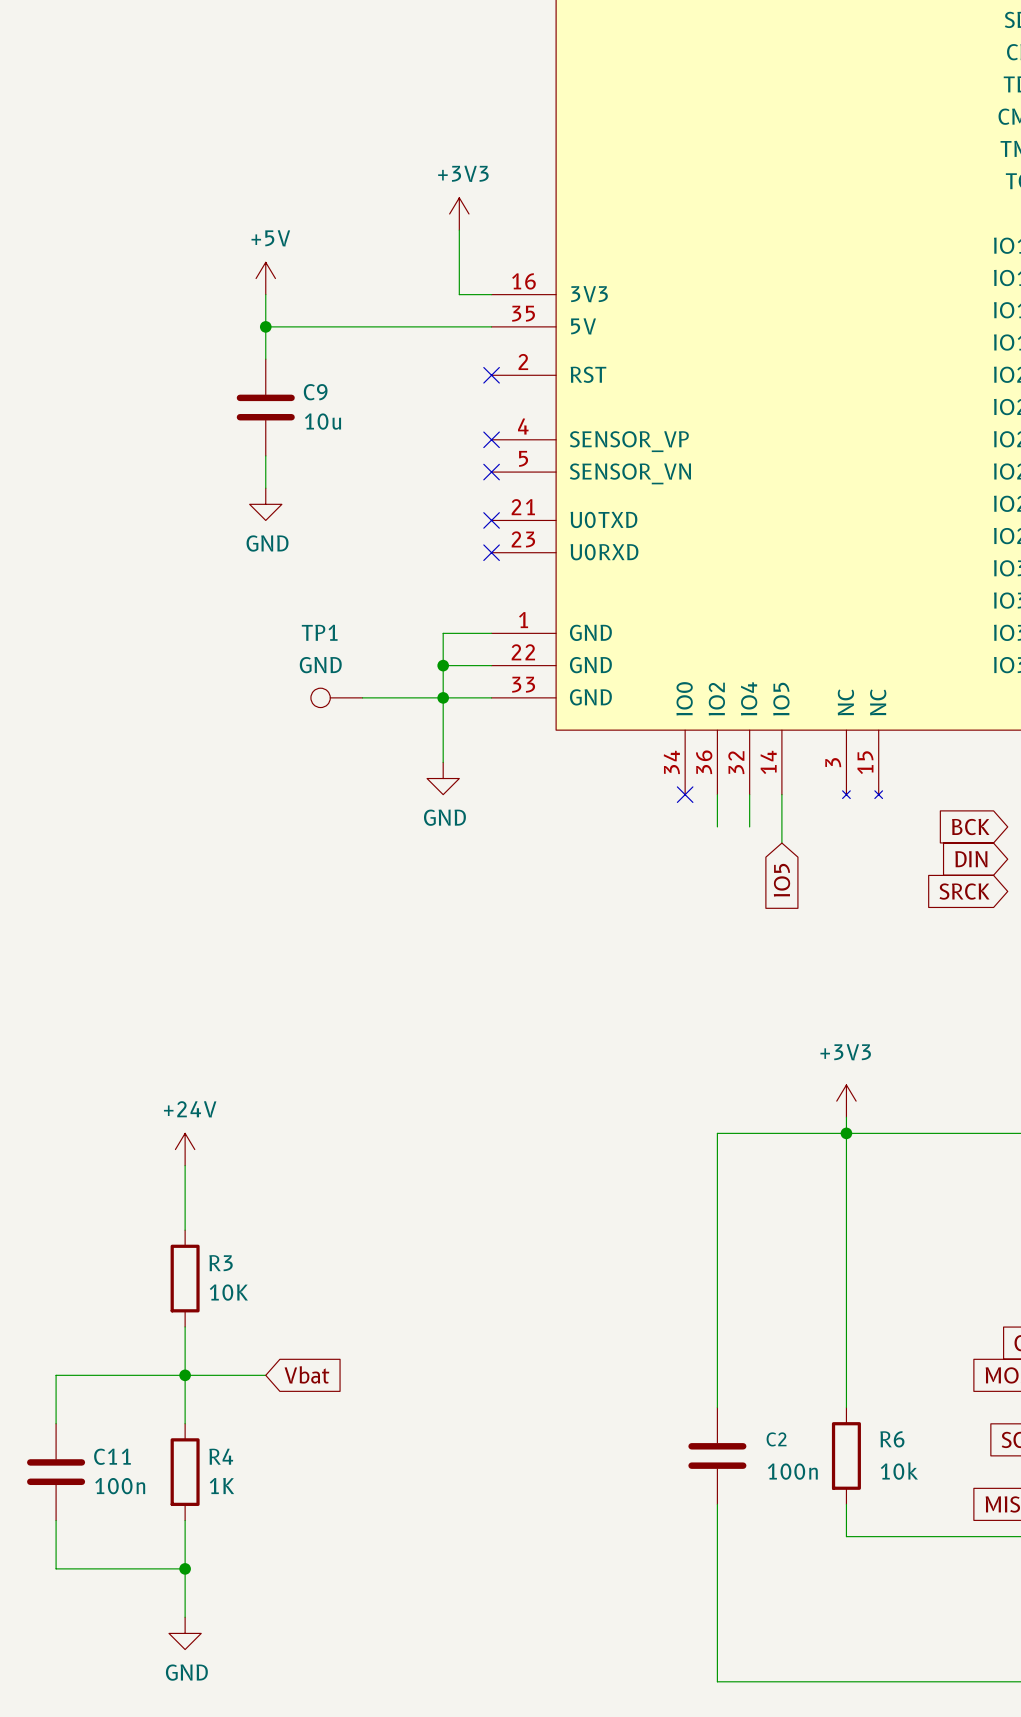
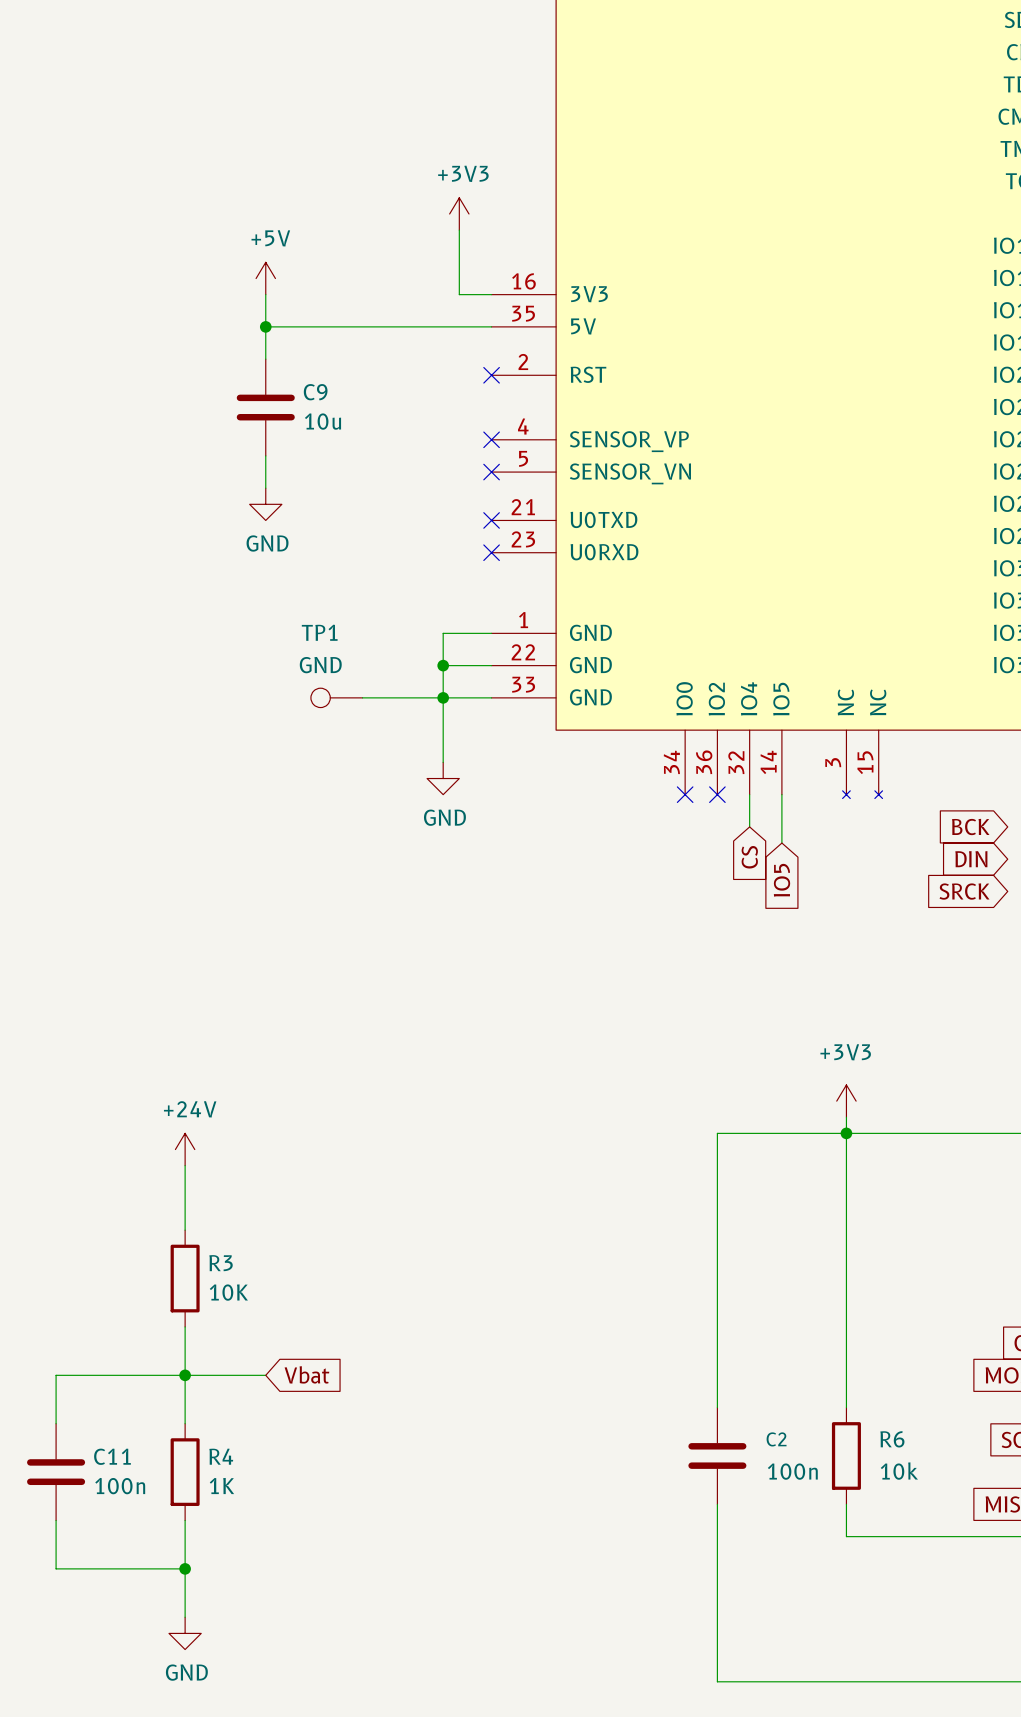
wire: (717, 794) (717, 826) -> none
no-connect mark: none -> (717, 794)
global label: none -> CS (749, 857)

